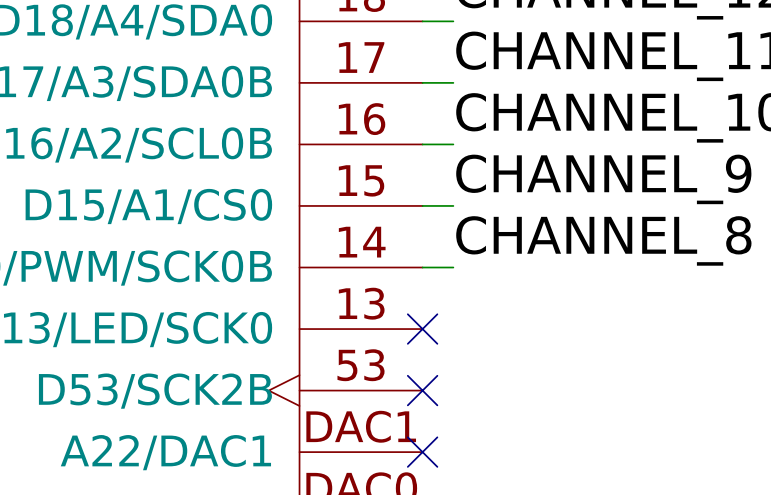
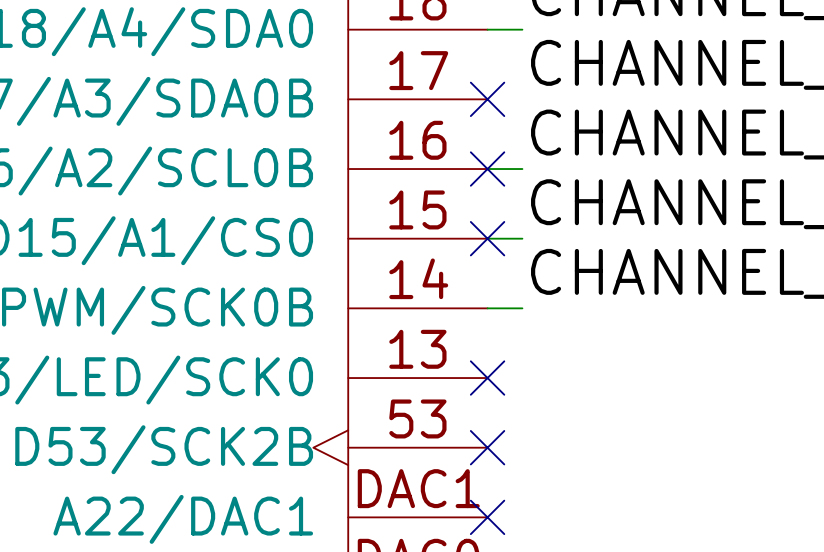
wire: (422, 82) (453, 82) -> none
no-connect mark: none -> (487, 99)
no-connect mark: none -> (487, 169)
no-connect mark: none -> (487, 238)

